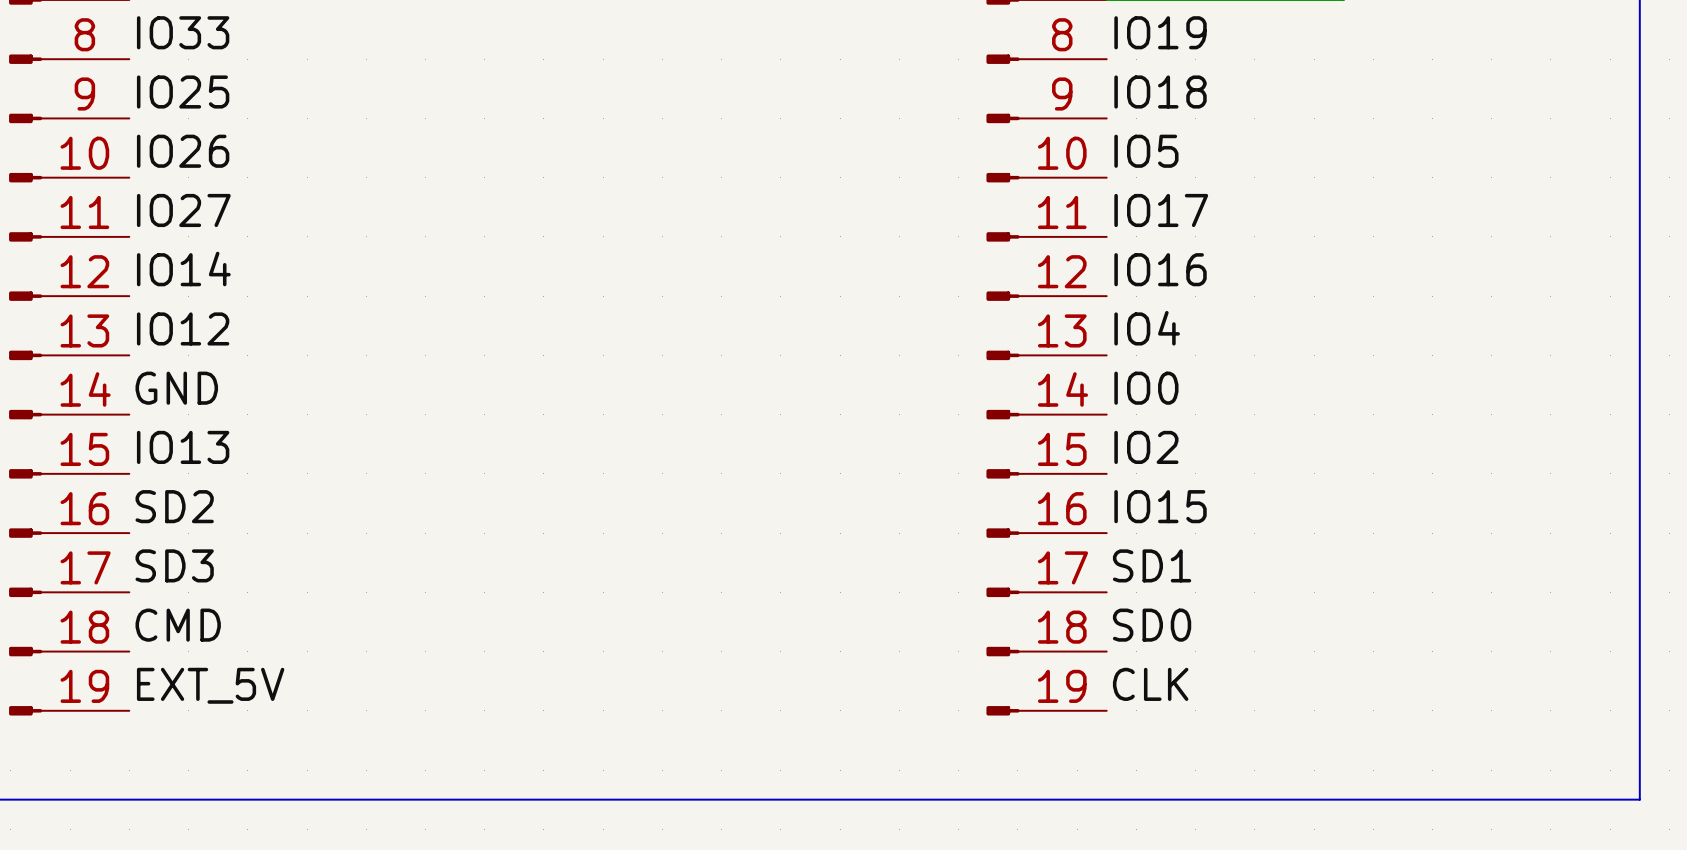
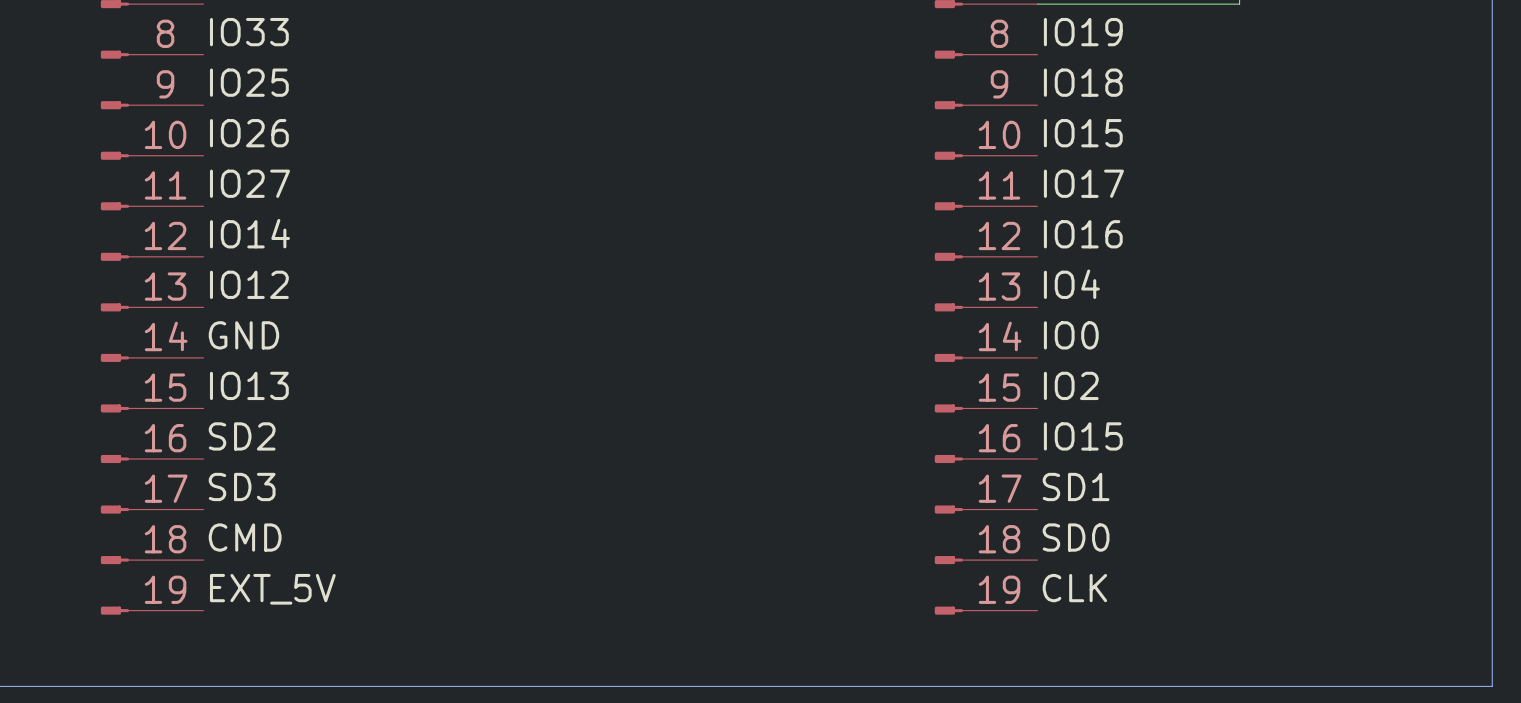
label: IO5 (1146, 151) -> IO15 (1083, 133)

